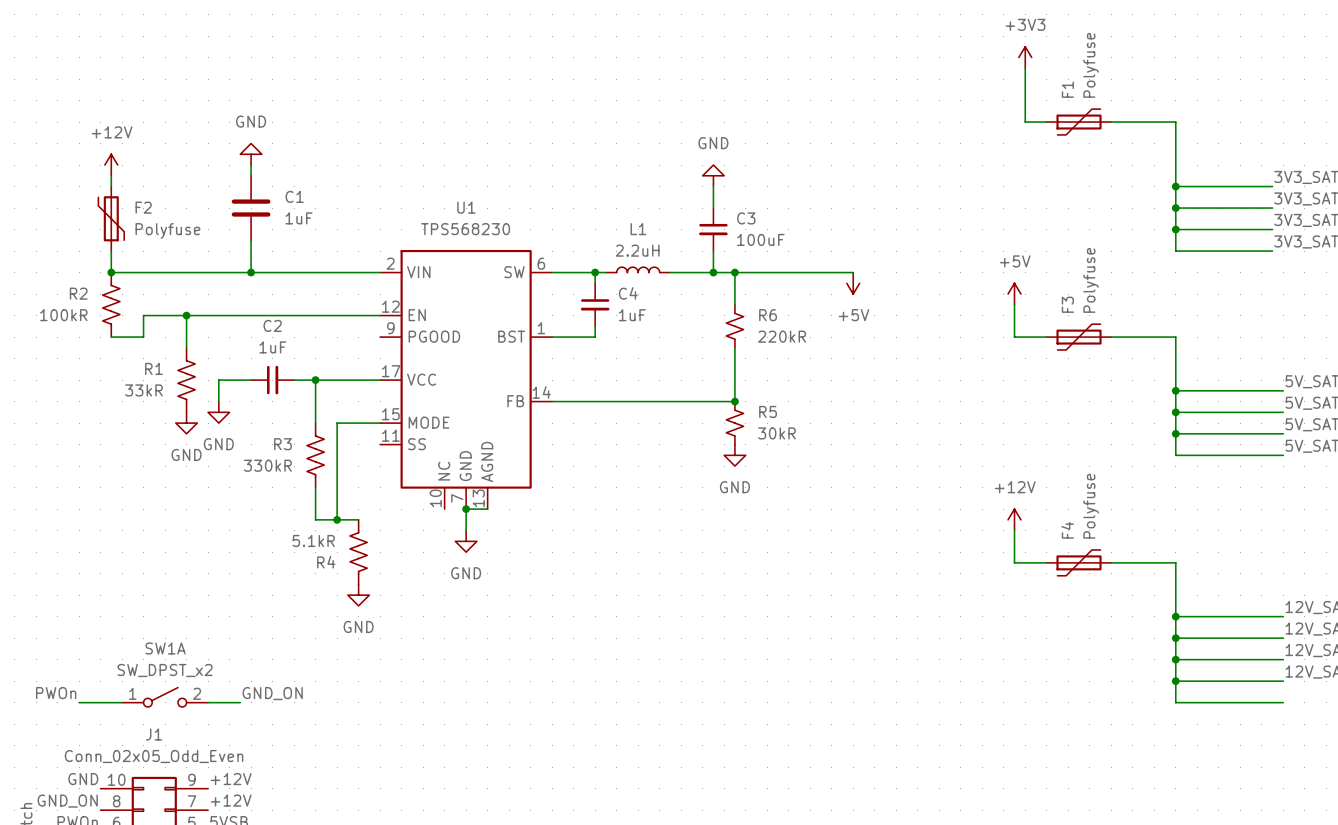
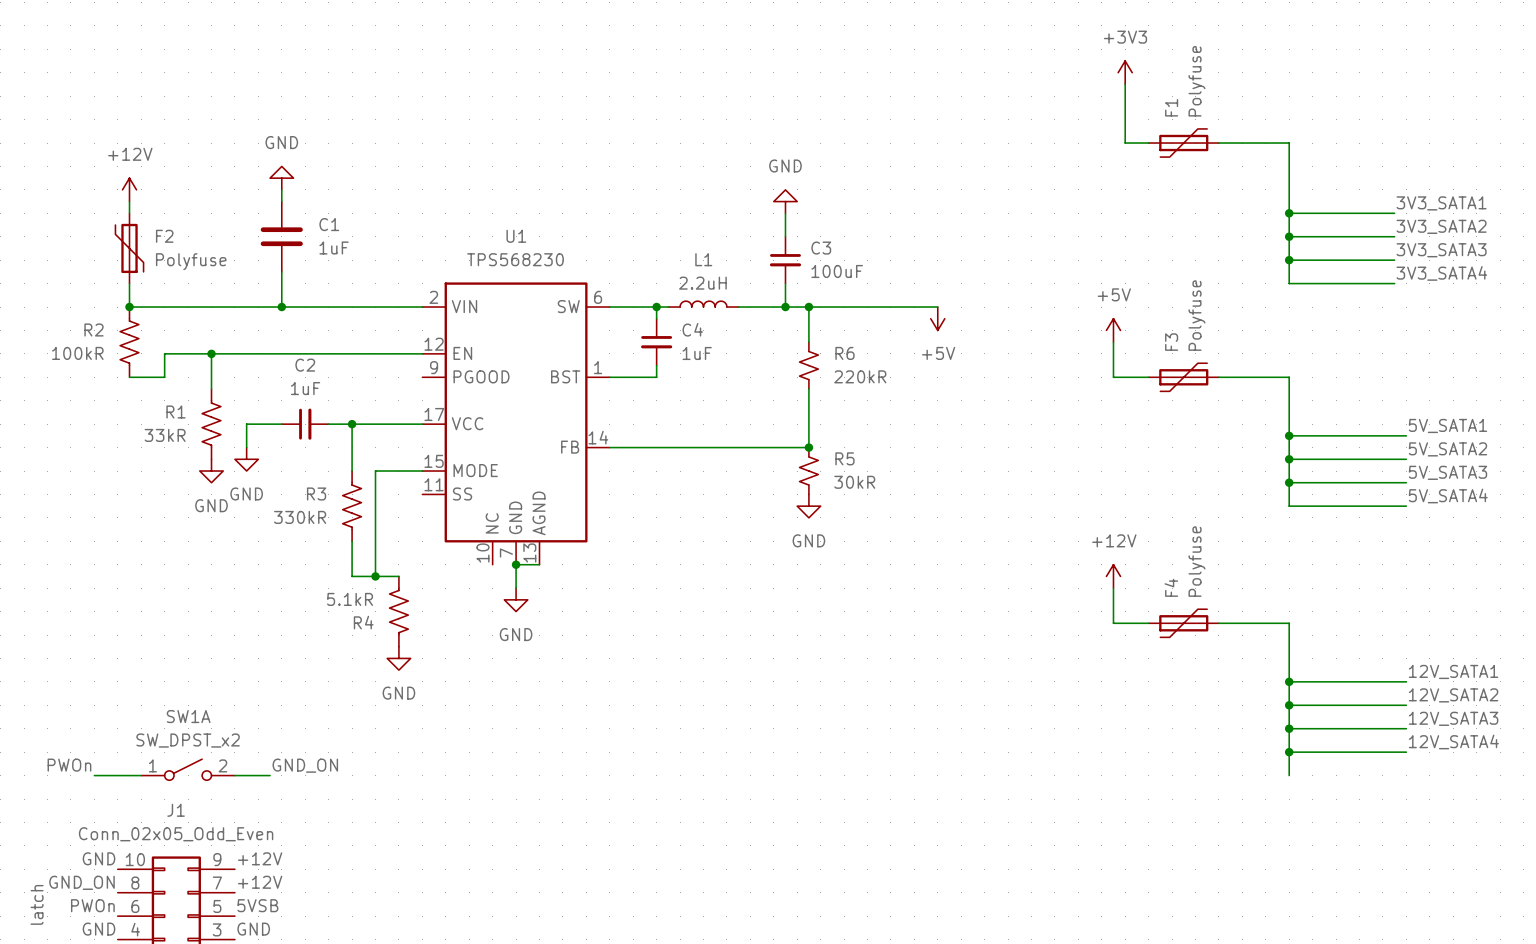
wire: (1175, 702) (1283, 702) -> none

